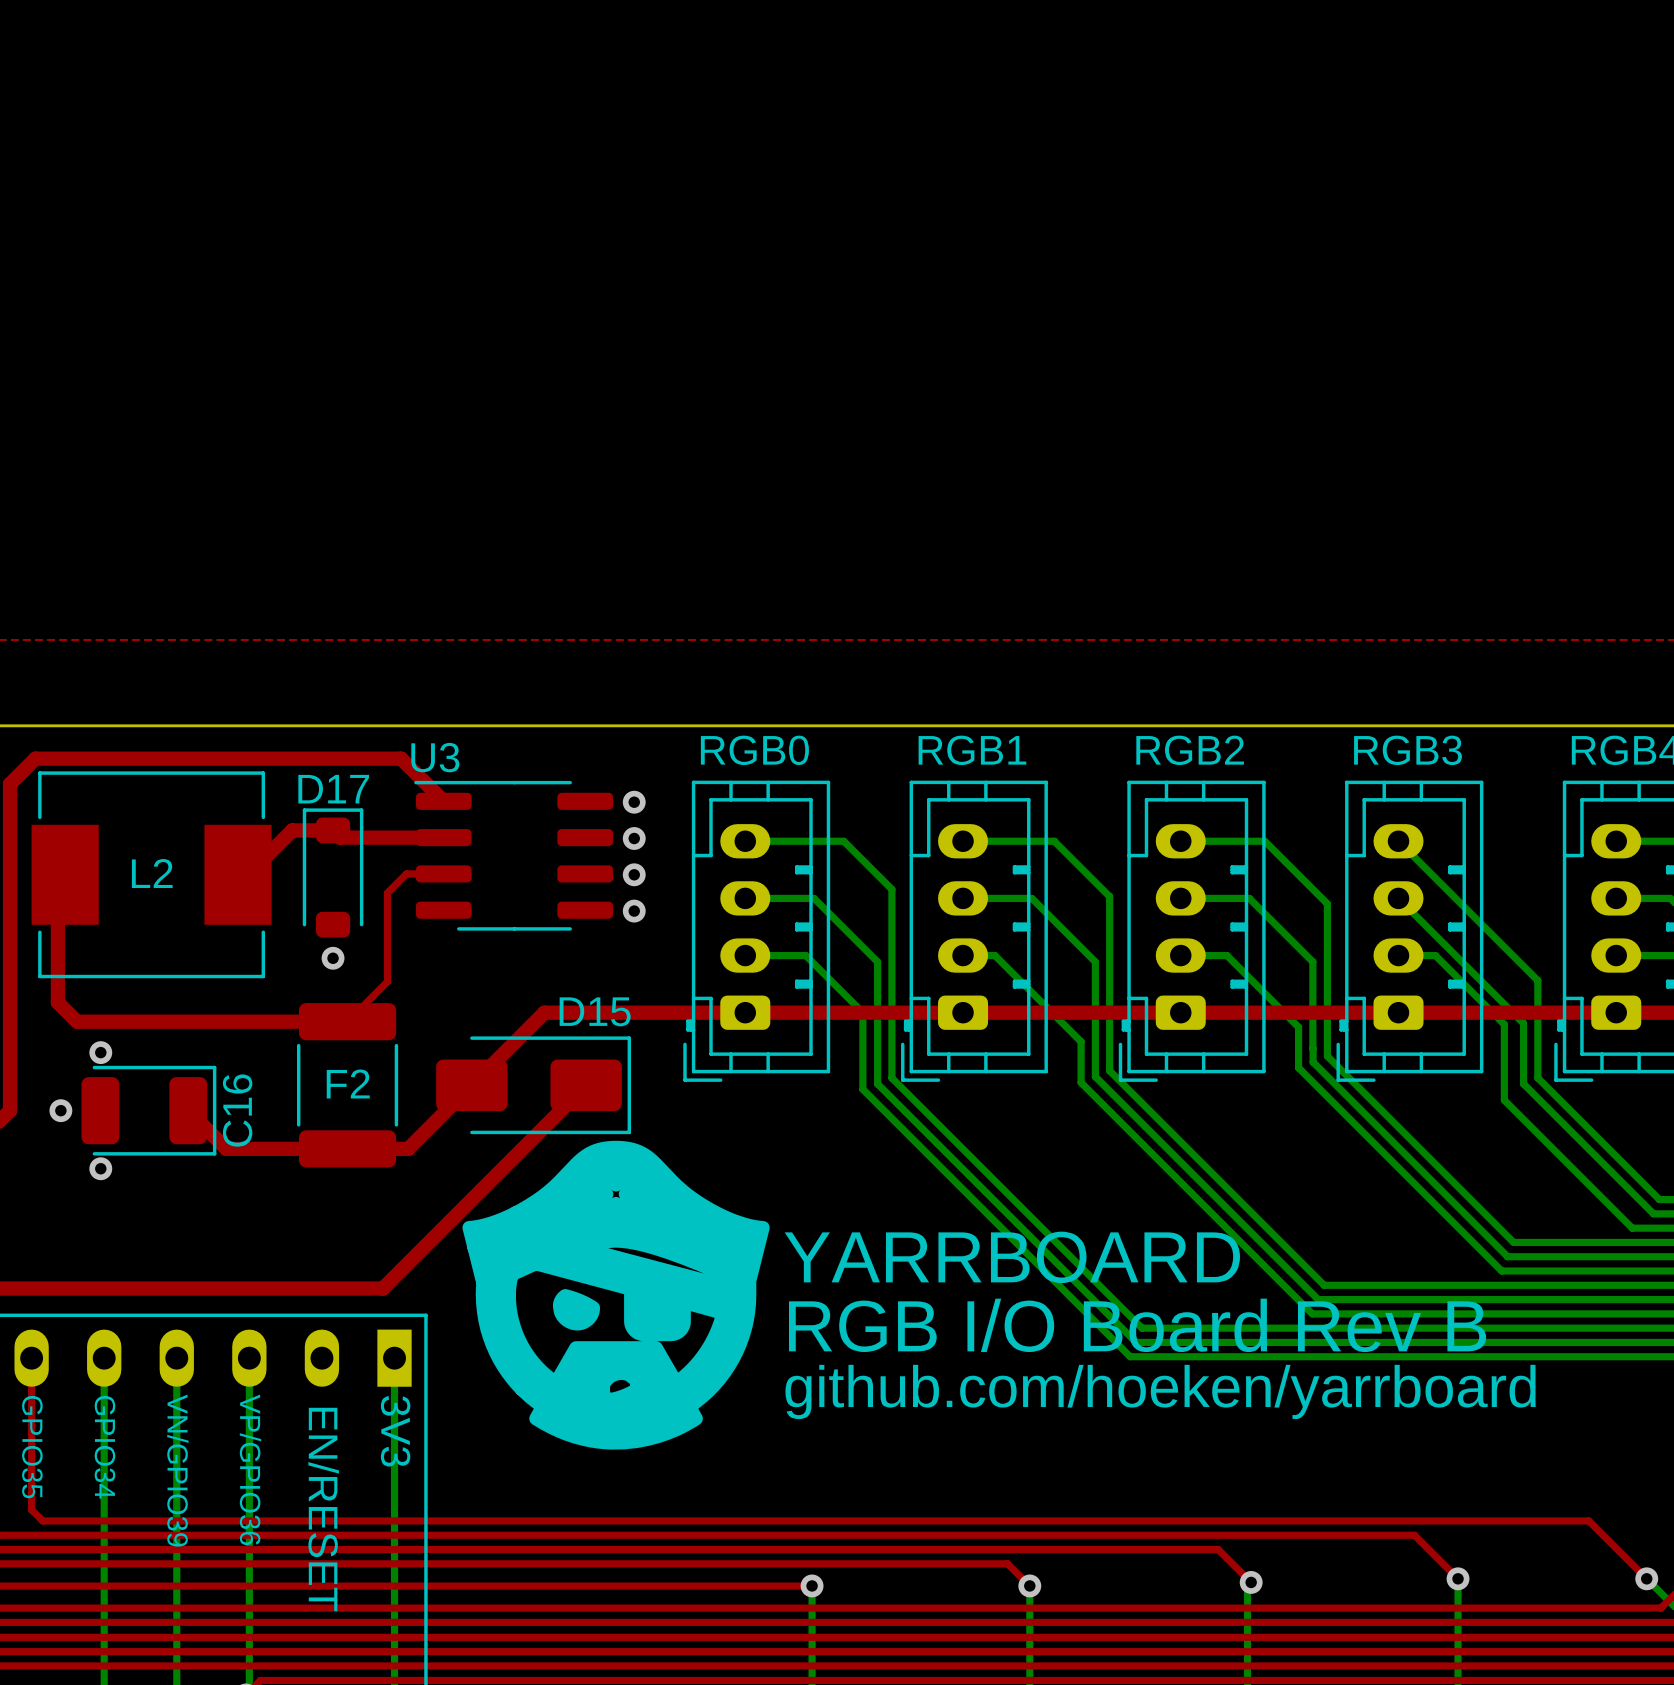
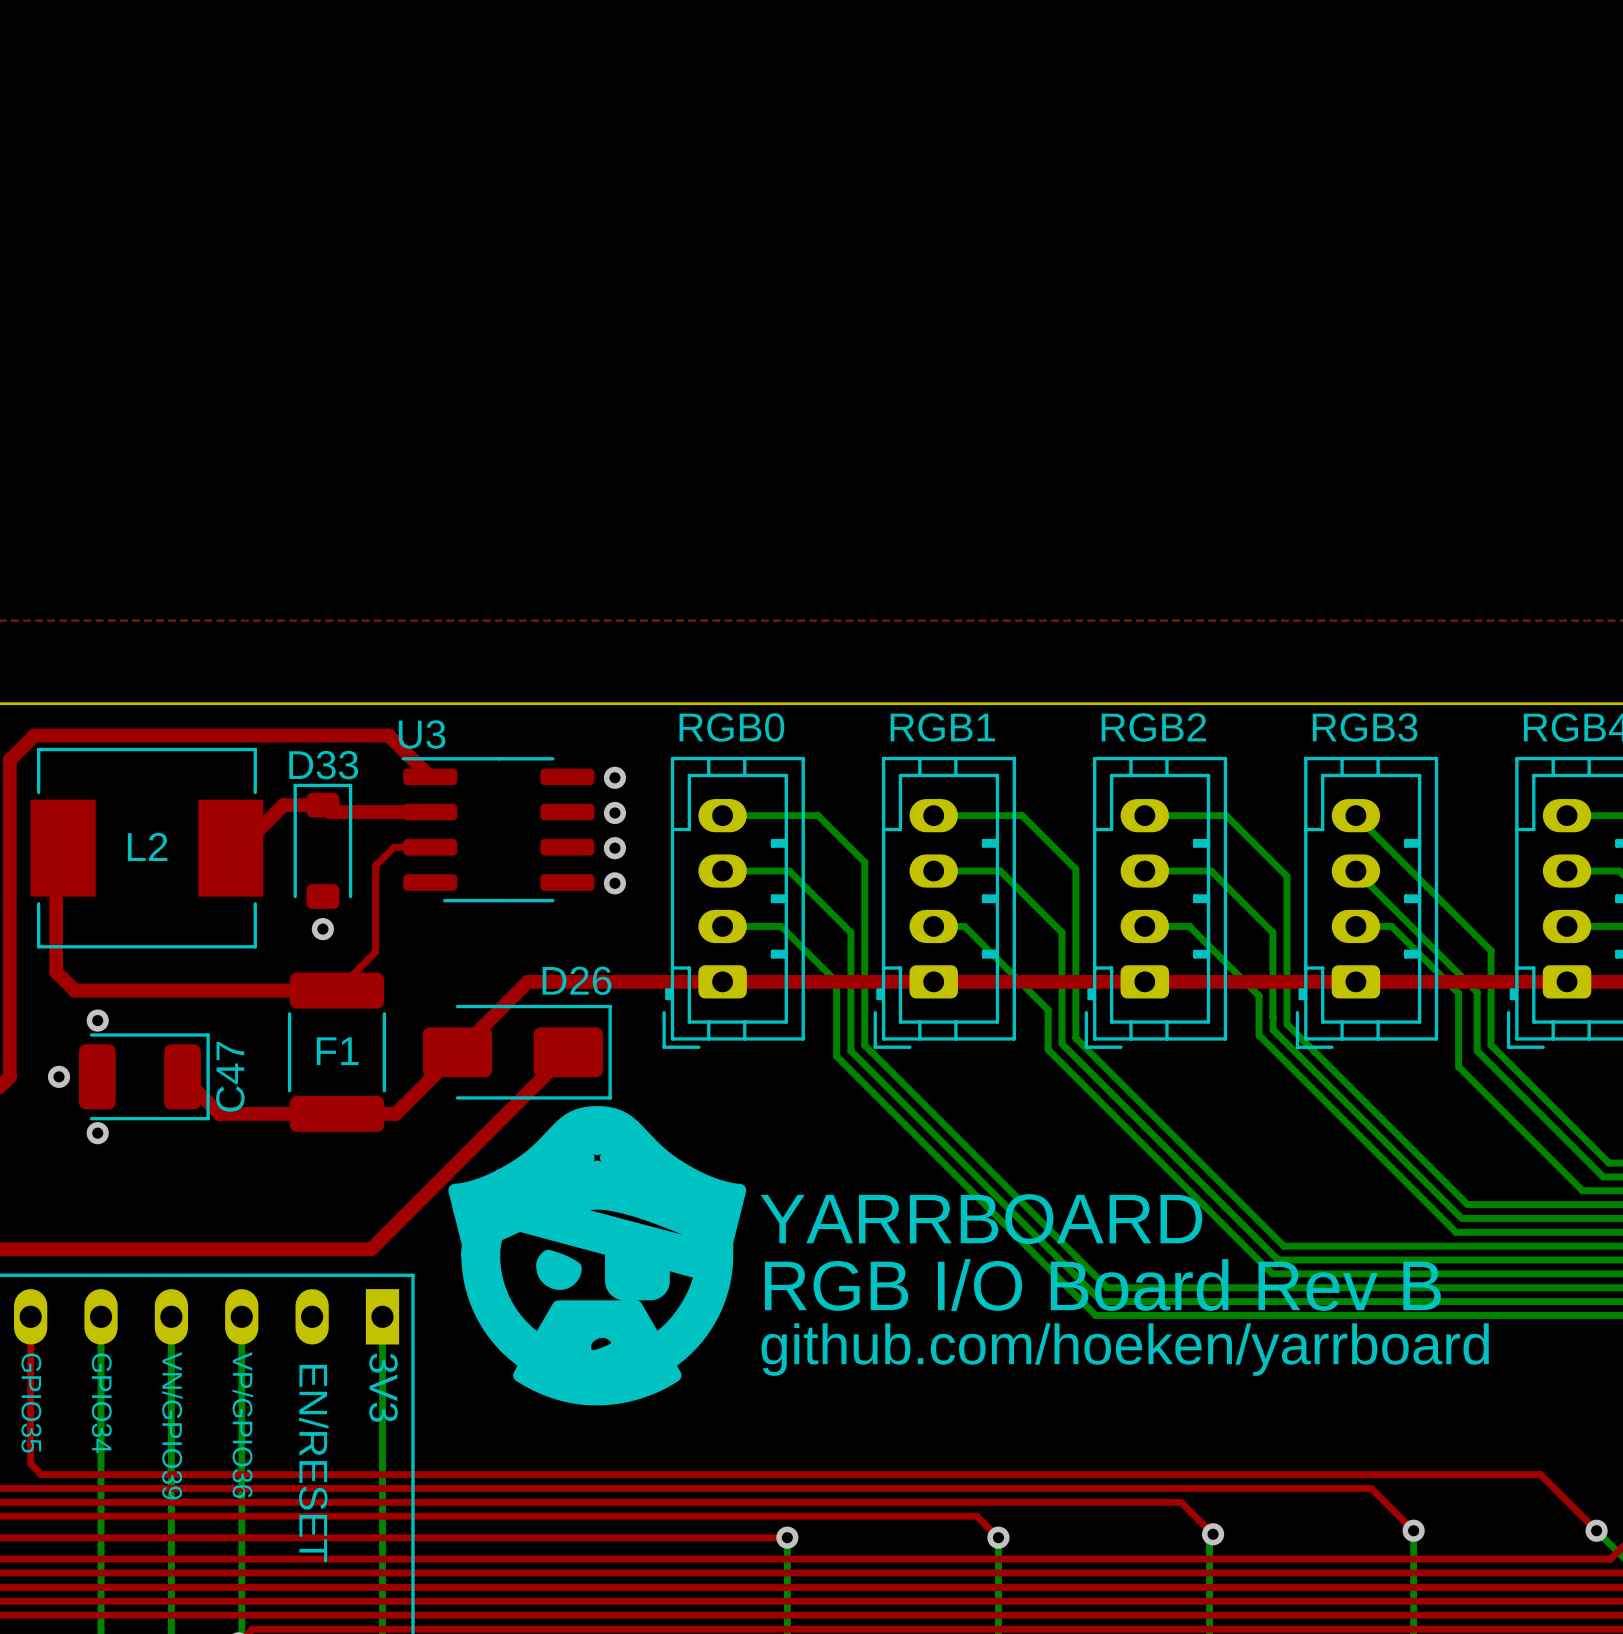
D17 name: D17 (333, 789) -> D33 (323, 765)
D15 name: D15 (595, 1011) -> D26 (577, 980)
F2 name: F2 (348, 1083) -> F1 (337, 1051)
C16 name: C16 (237, 1110) -> C47 (230, 1076)

